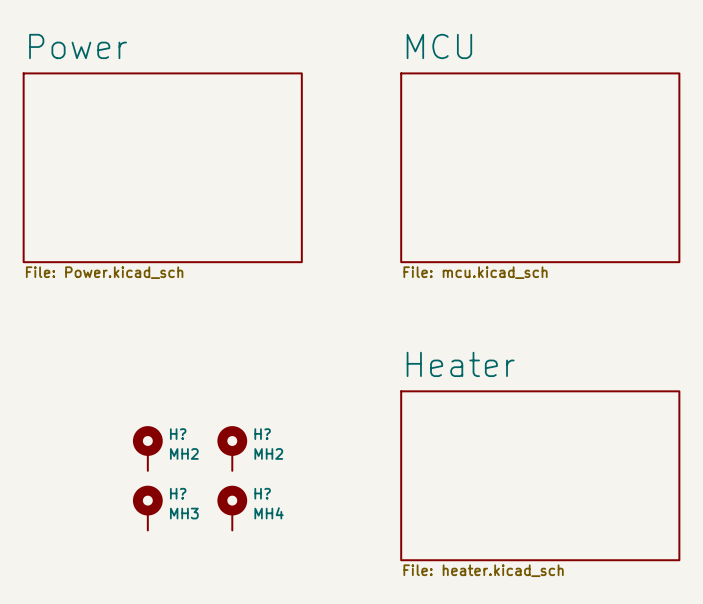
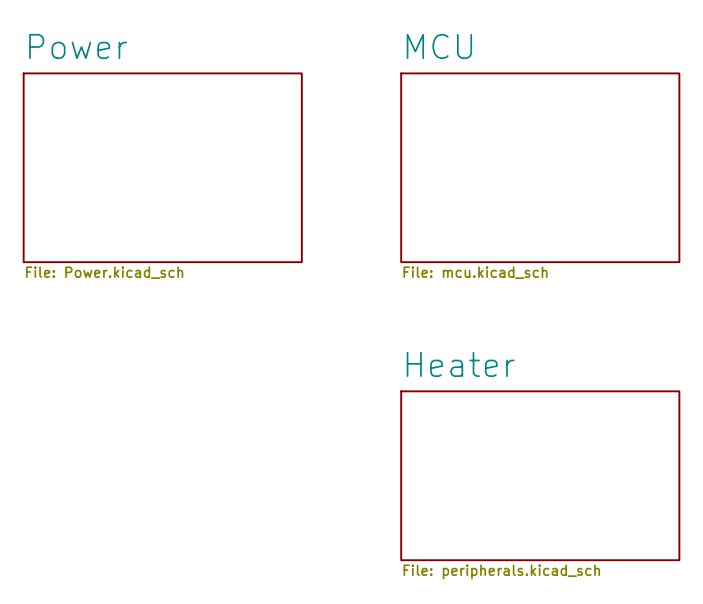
H?: MH2 (147, 448) -> none
H?: MH2 (232, 448) -> none
H?: MH3 (147, 508) -> none
H?: MH4 (232, 508) -> none
sheet Heater value: File: heater.kicad_sch (483, 570) -> File: peripherals.kicad_sch (501, 571)

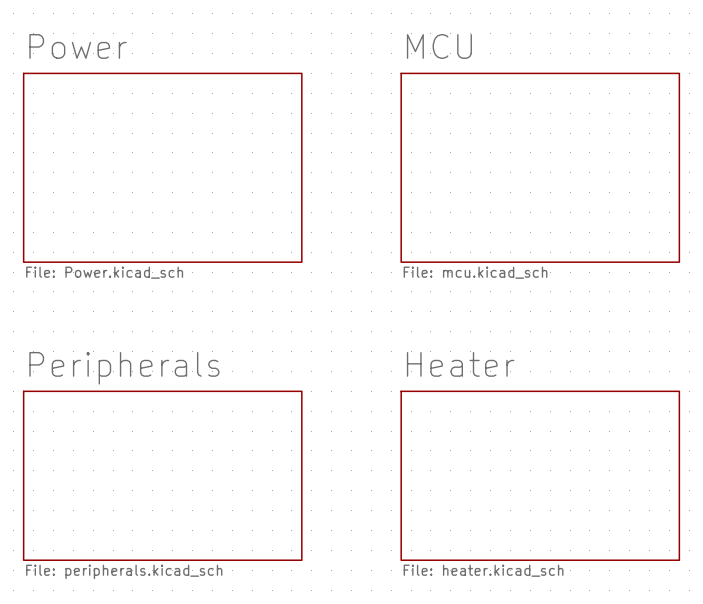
sheet Peripherals: none -> File: peripherals.kicad_sch (162, 475)
sheet Heater value: File: peripherals.kicad_sch (501, 571) -> File: heater.kicad_sch (483, 570)

